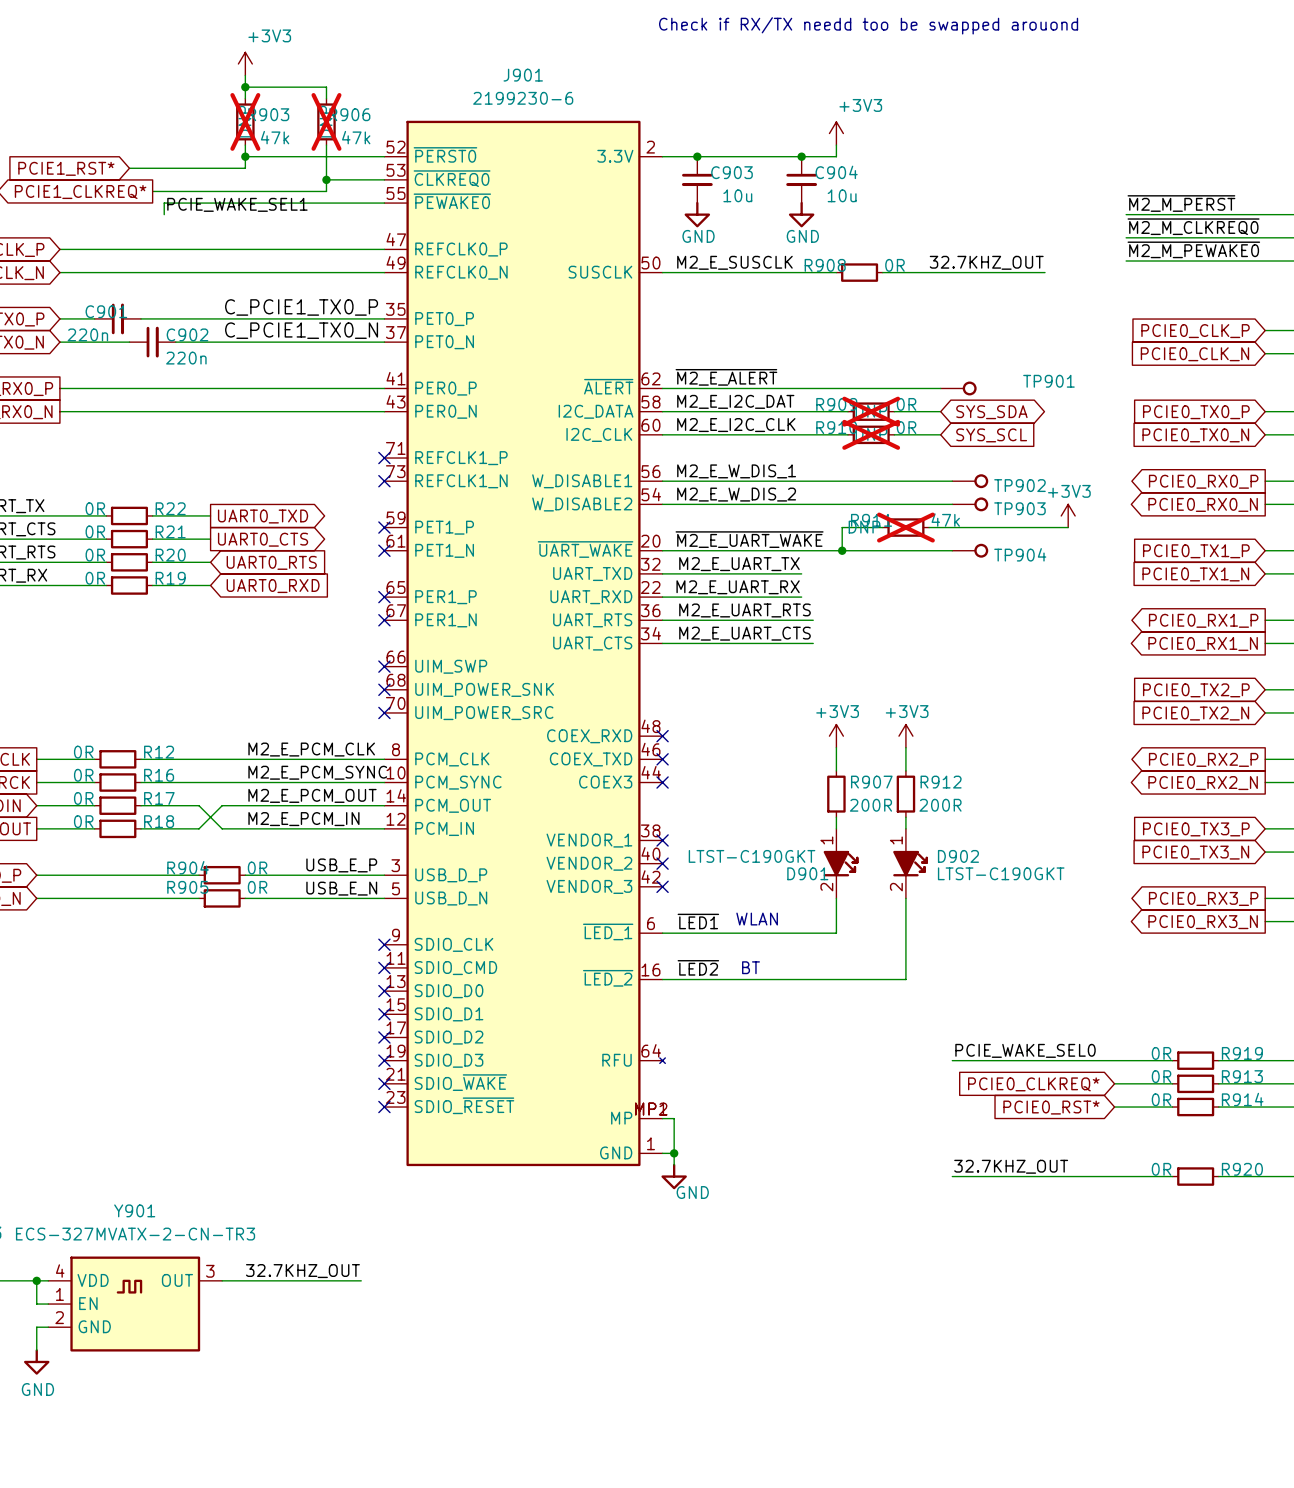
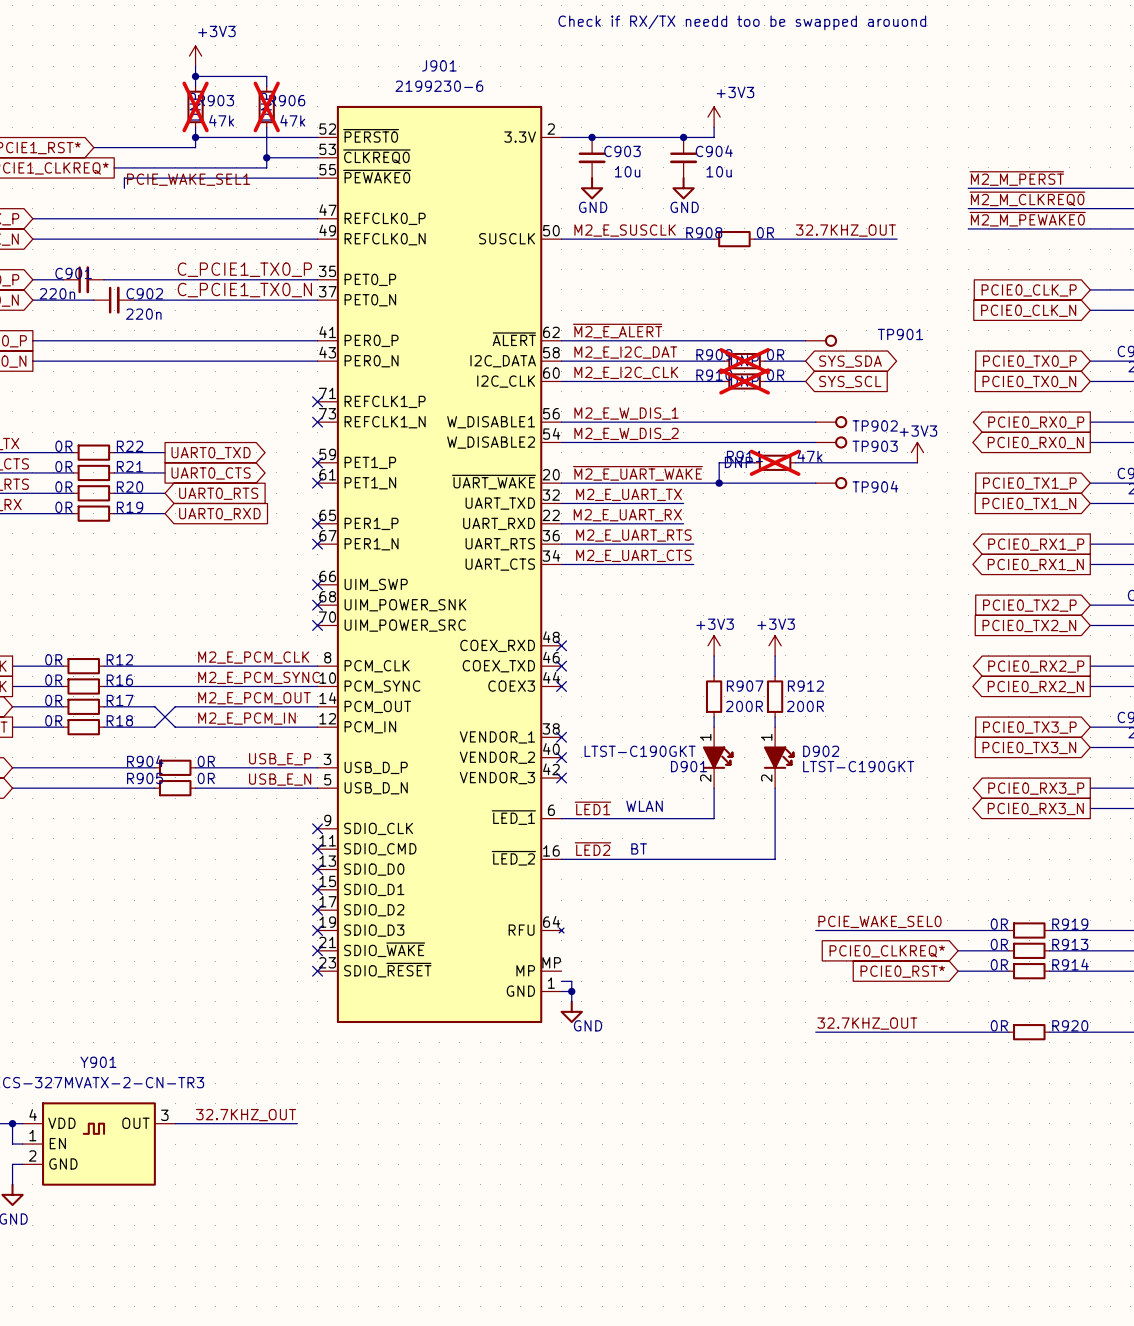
J901 symbol: [384, 120, 666, 1167] -> [317, 105, 564, 1024]
junction position: (674, 1153) -> (571, 991)
power symbol position: GND (674, 1176) -> GND (571, 1011)

